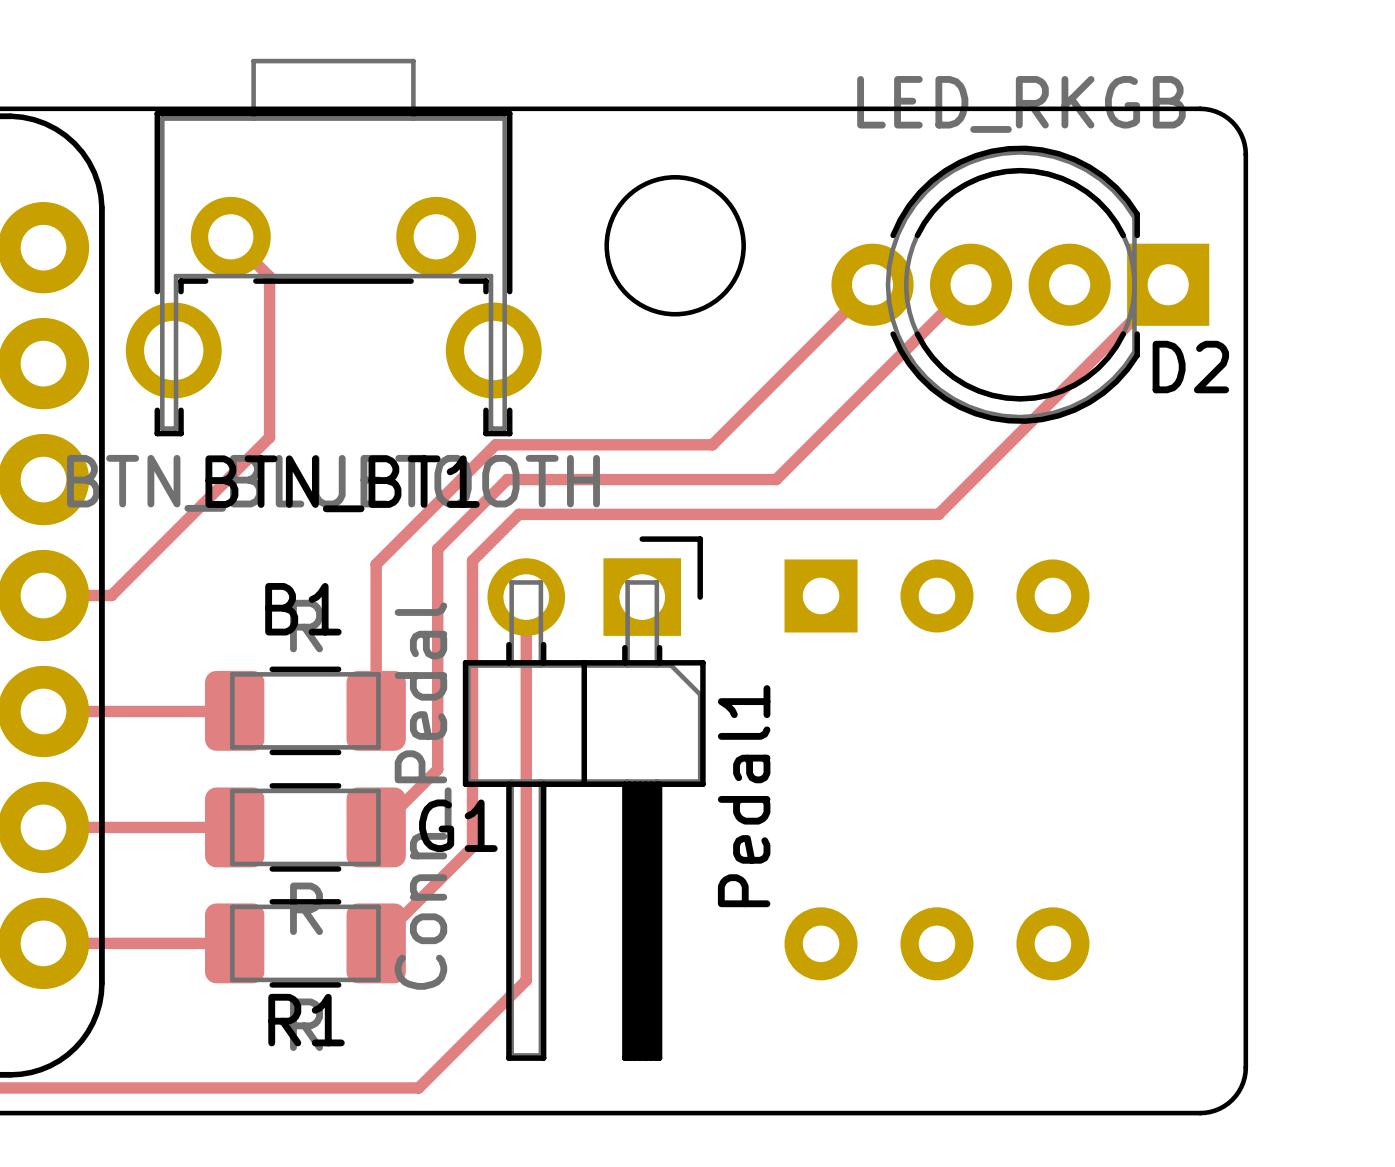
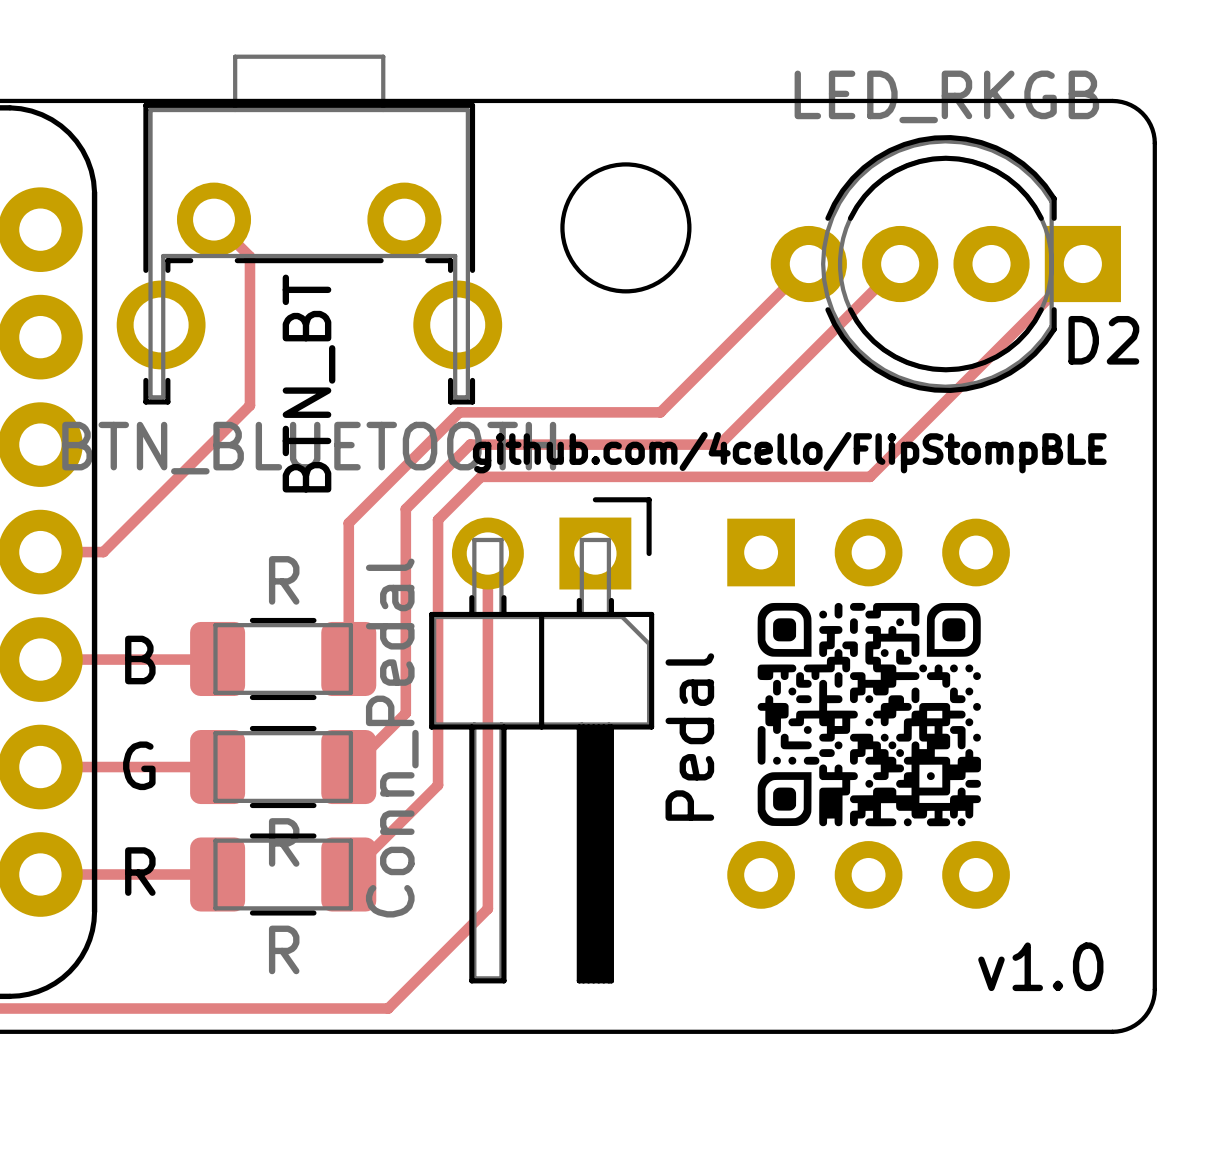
BTN_BT1 name: BTN_BT1 (342, 483) -> BTN_BT (309, 383)
text: none -> github.com/4cello/FlipStompBLE (789, 452)
B1 name: B1 (303, 609) -> B (140, 660)
drawing: none -> [757, 602, 981, 827]
Pedal1 name: Pedal1 (744, 796) -> Pedal (689, 737)
G1 name: G1 (458, 825) -> G (139, 765)
R1 name: R1 (306, 1020) -> R (140, 871)
text: none -> v1.0 (1040, 966)

